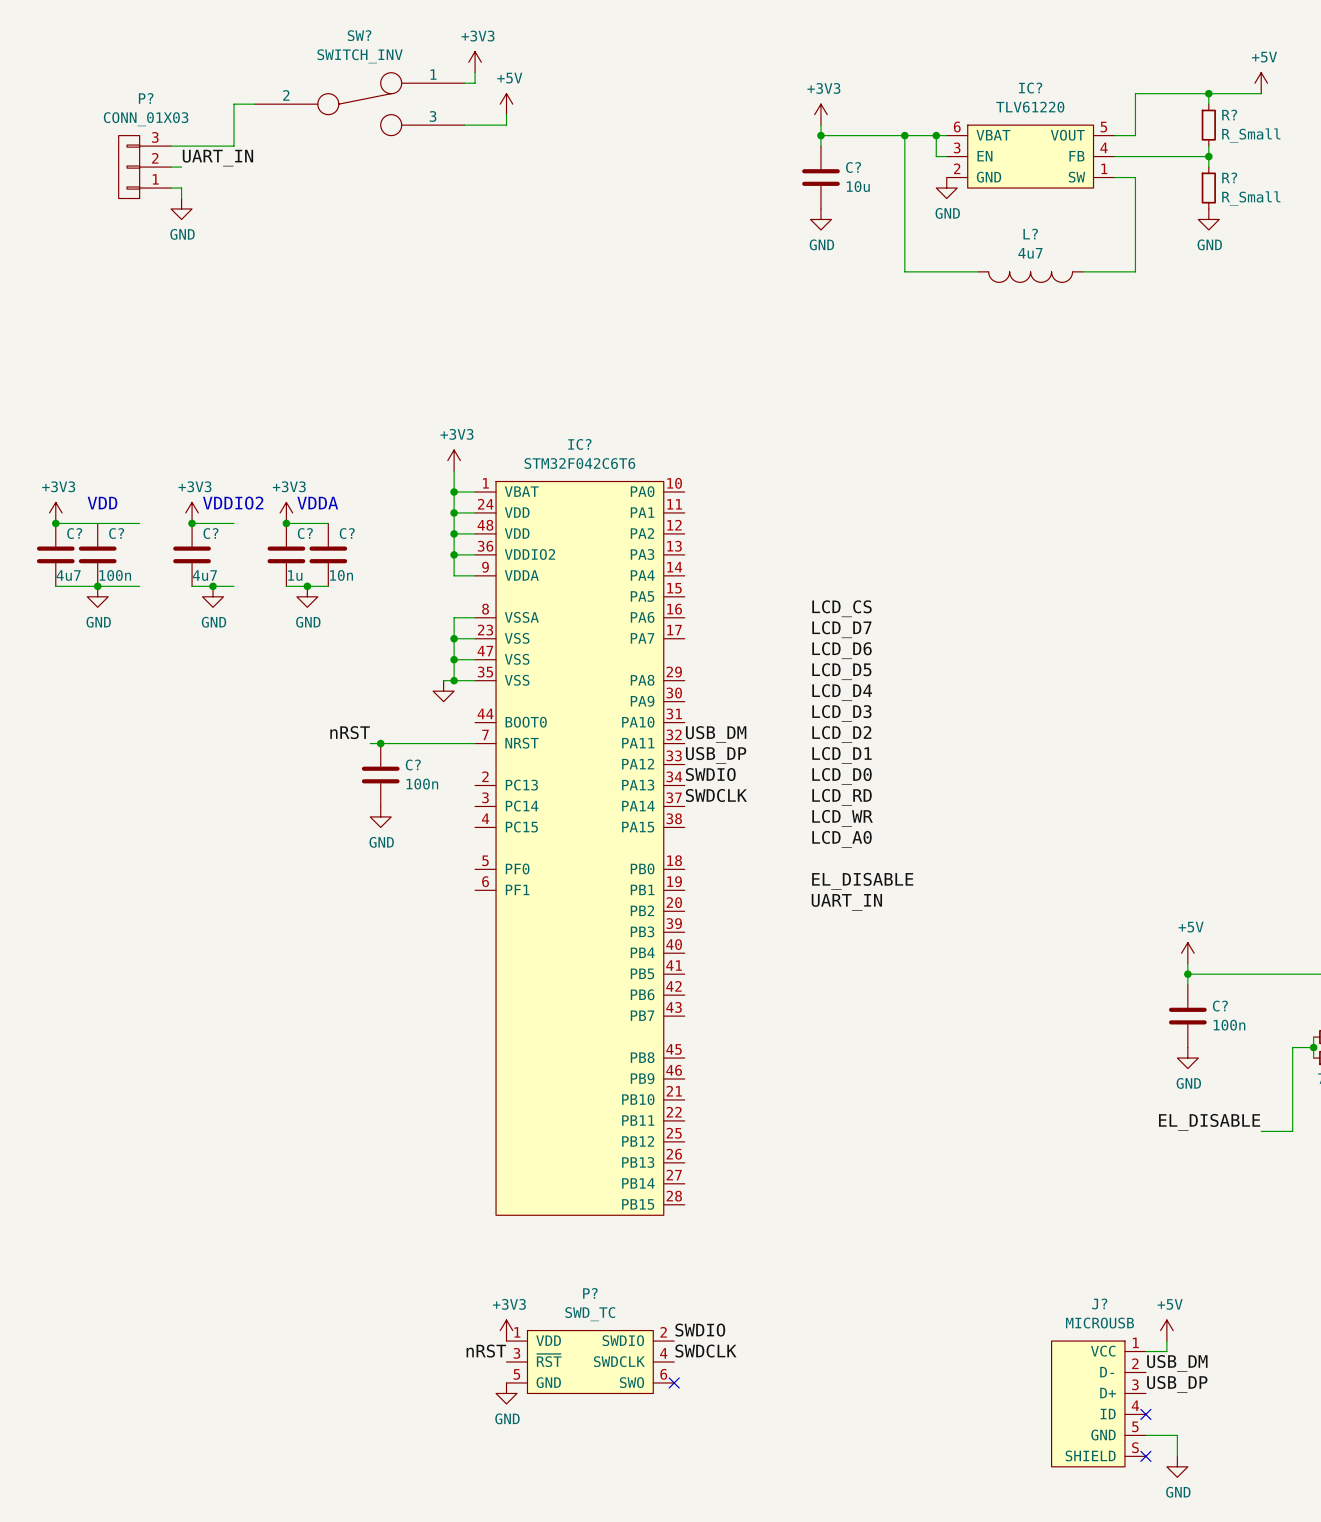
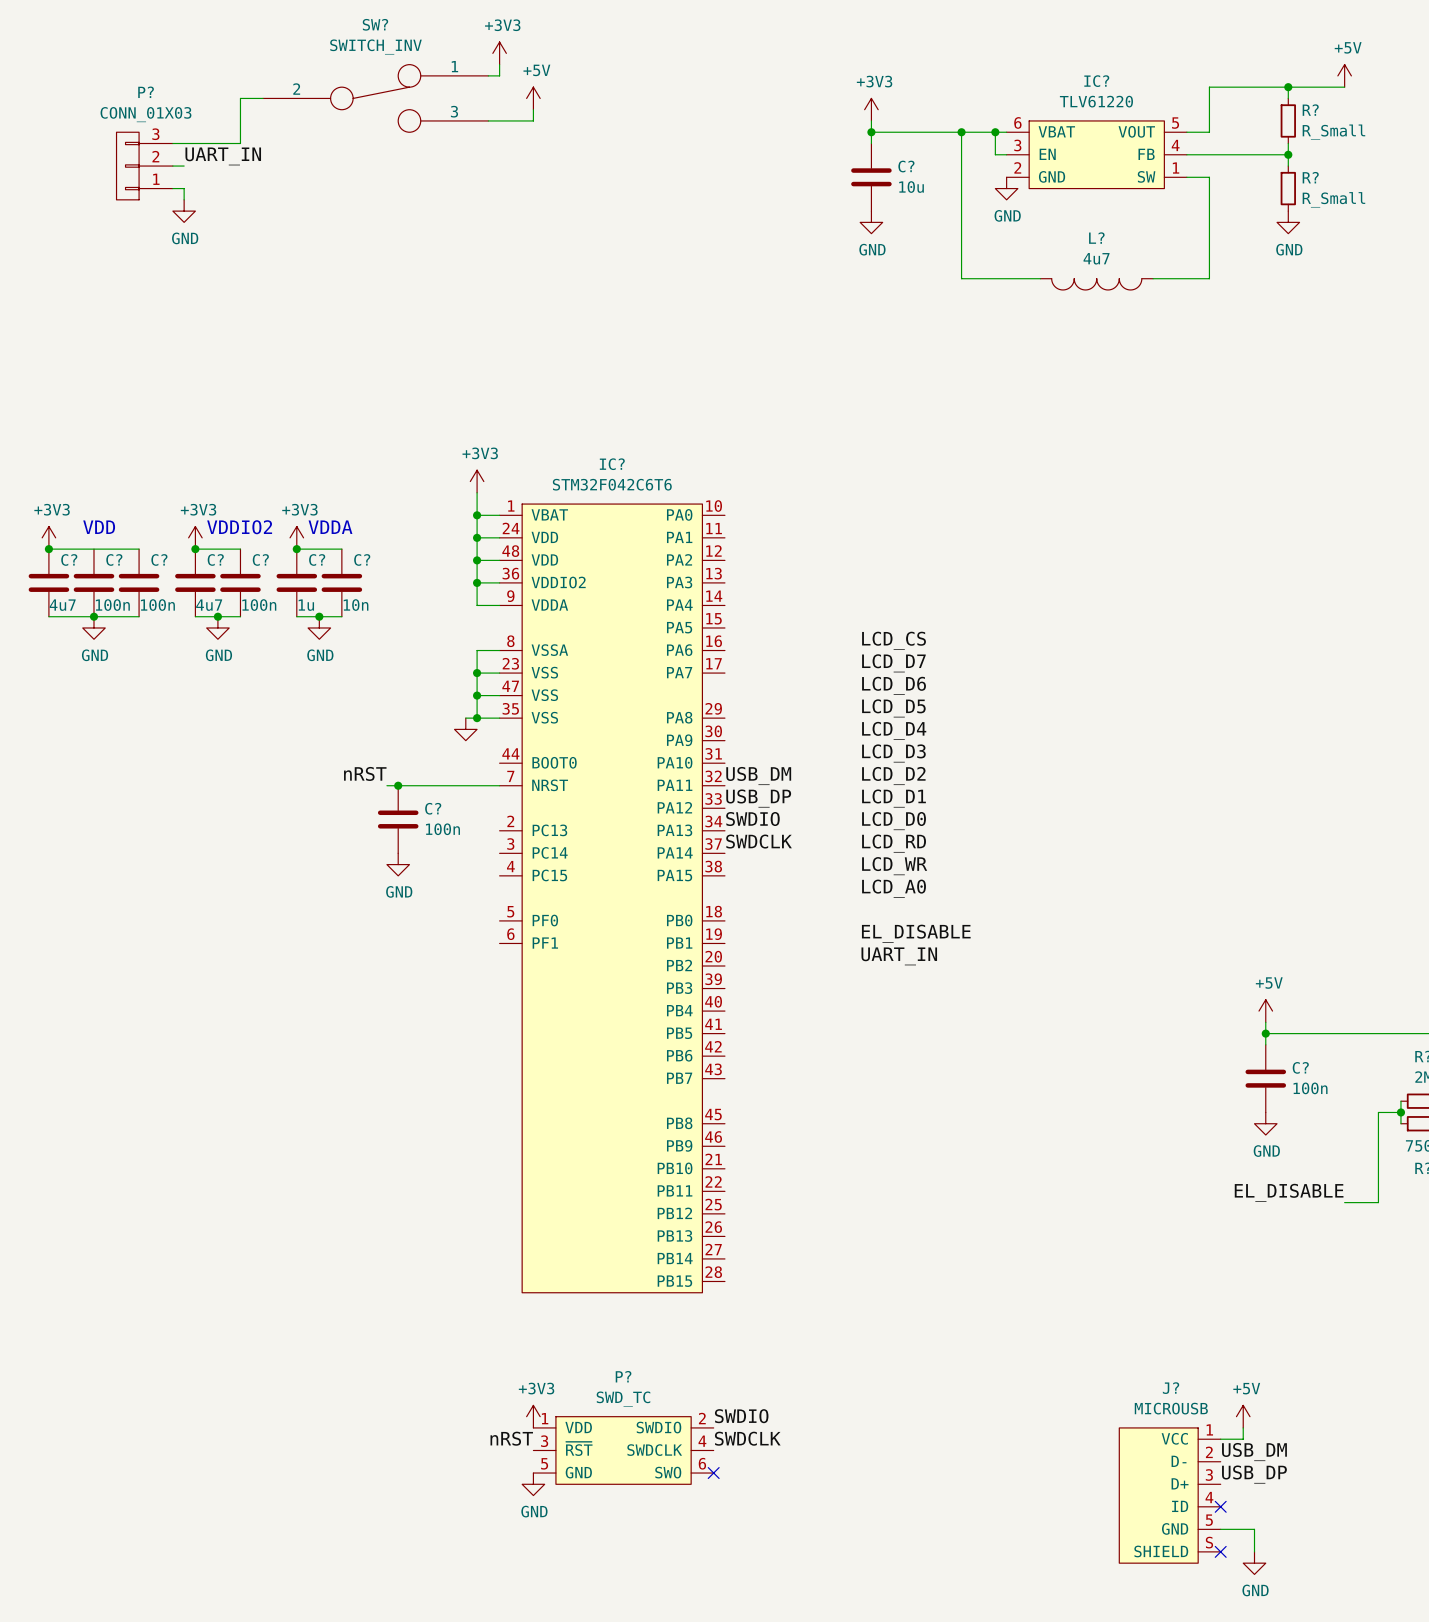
C?: none -> 100n (139, 582)
C?: none -> 100n (240, 582)

